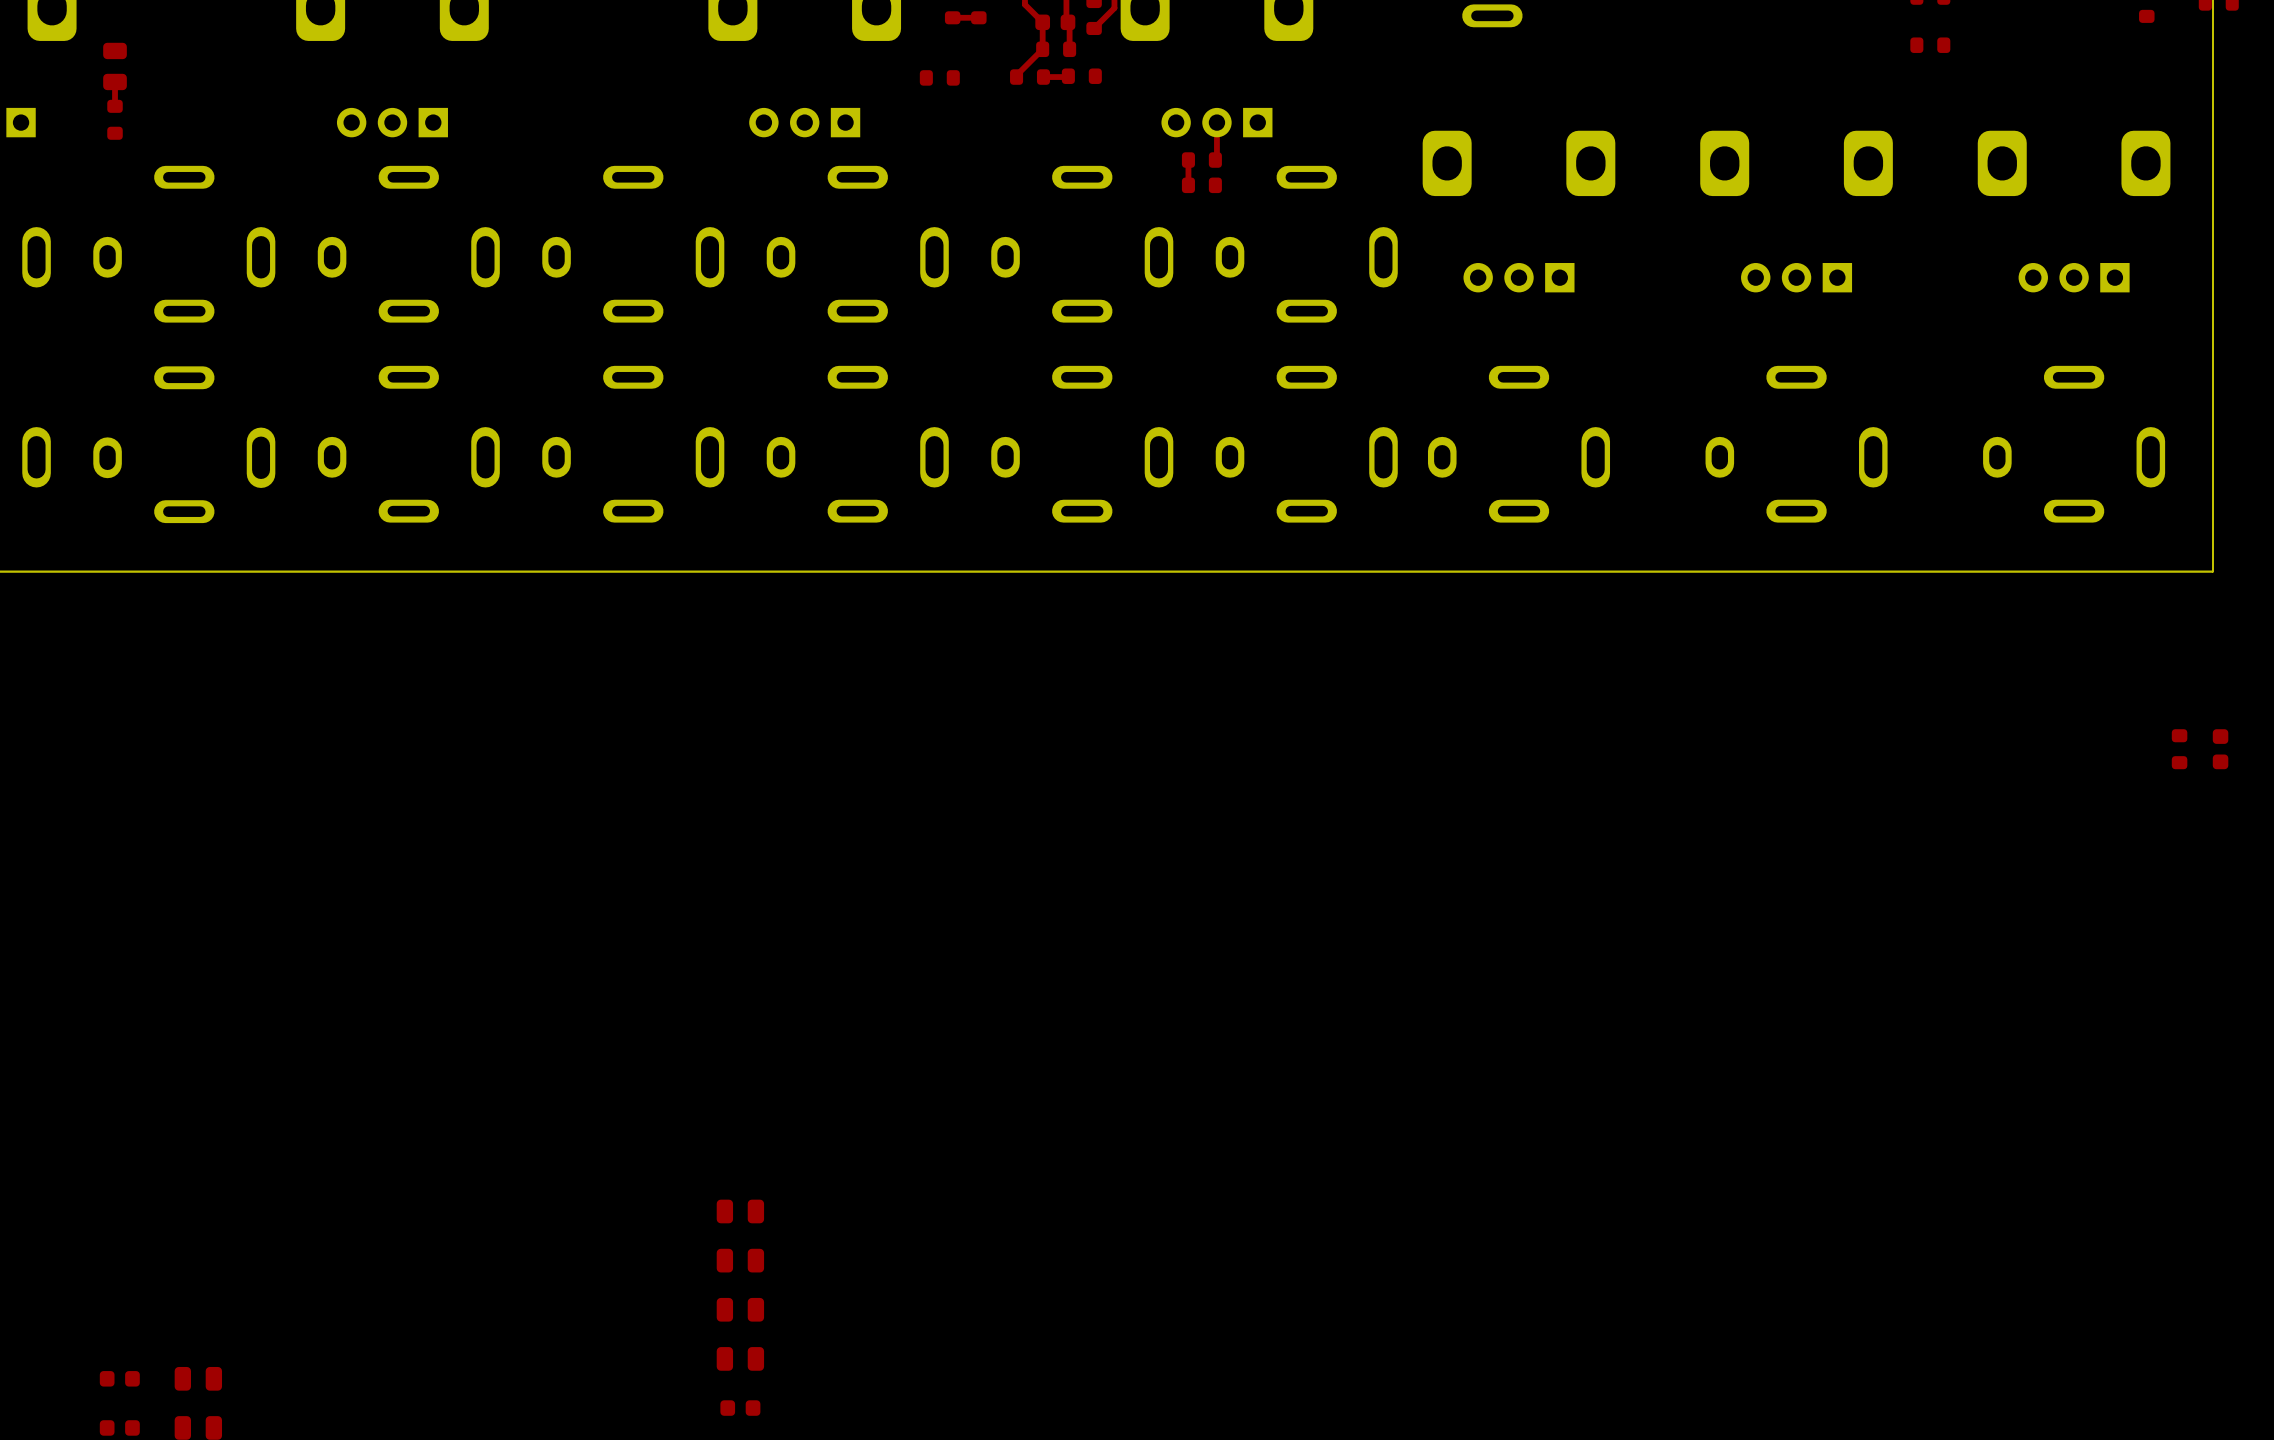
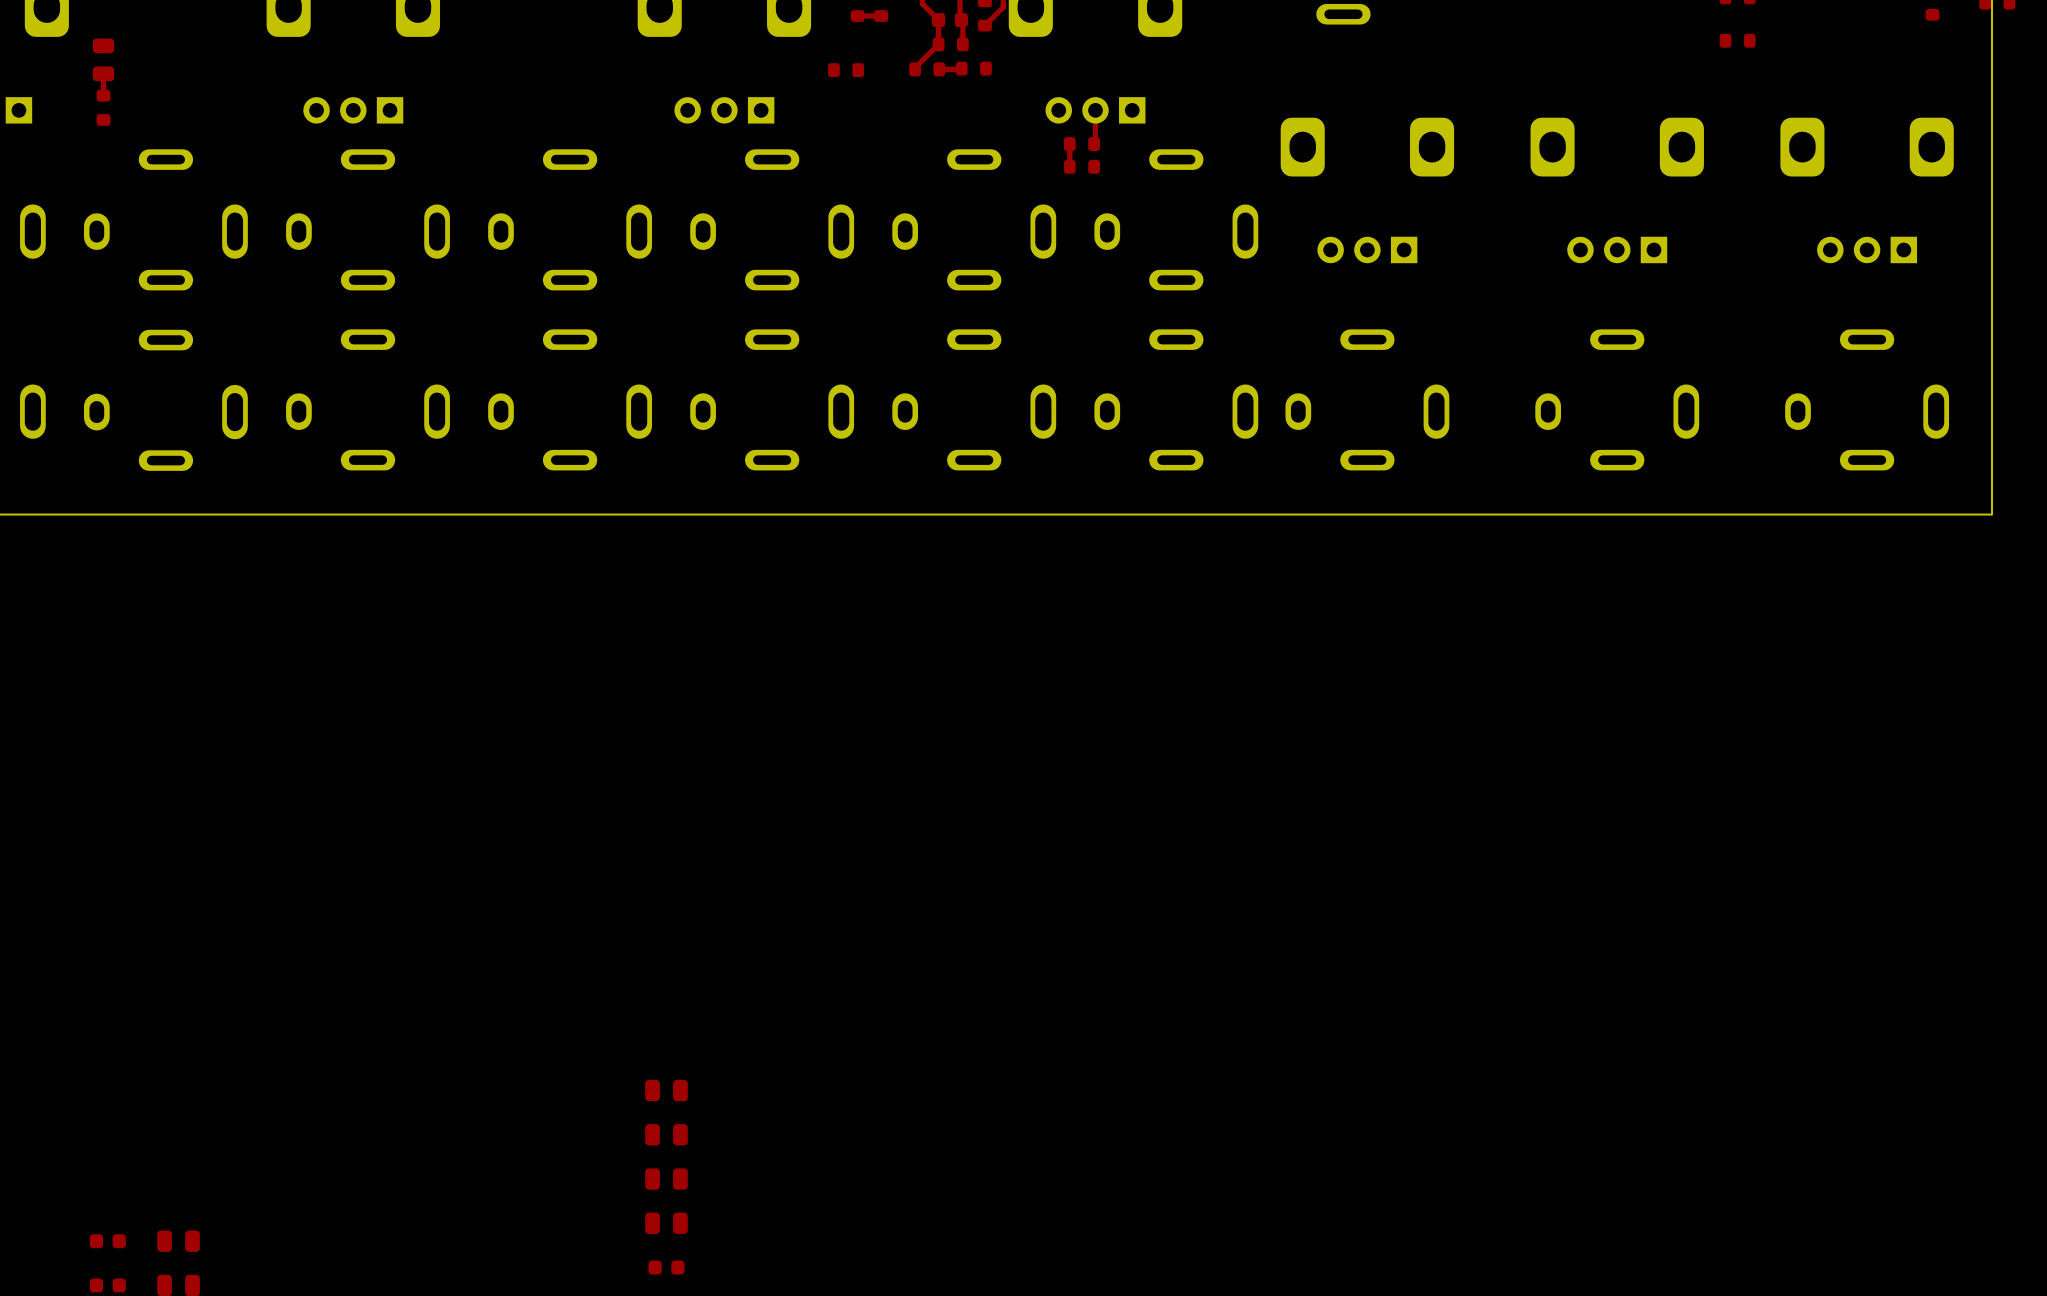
part: (2179, 749) -> none
part: (2220, 749) -> none

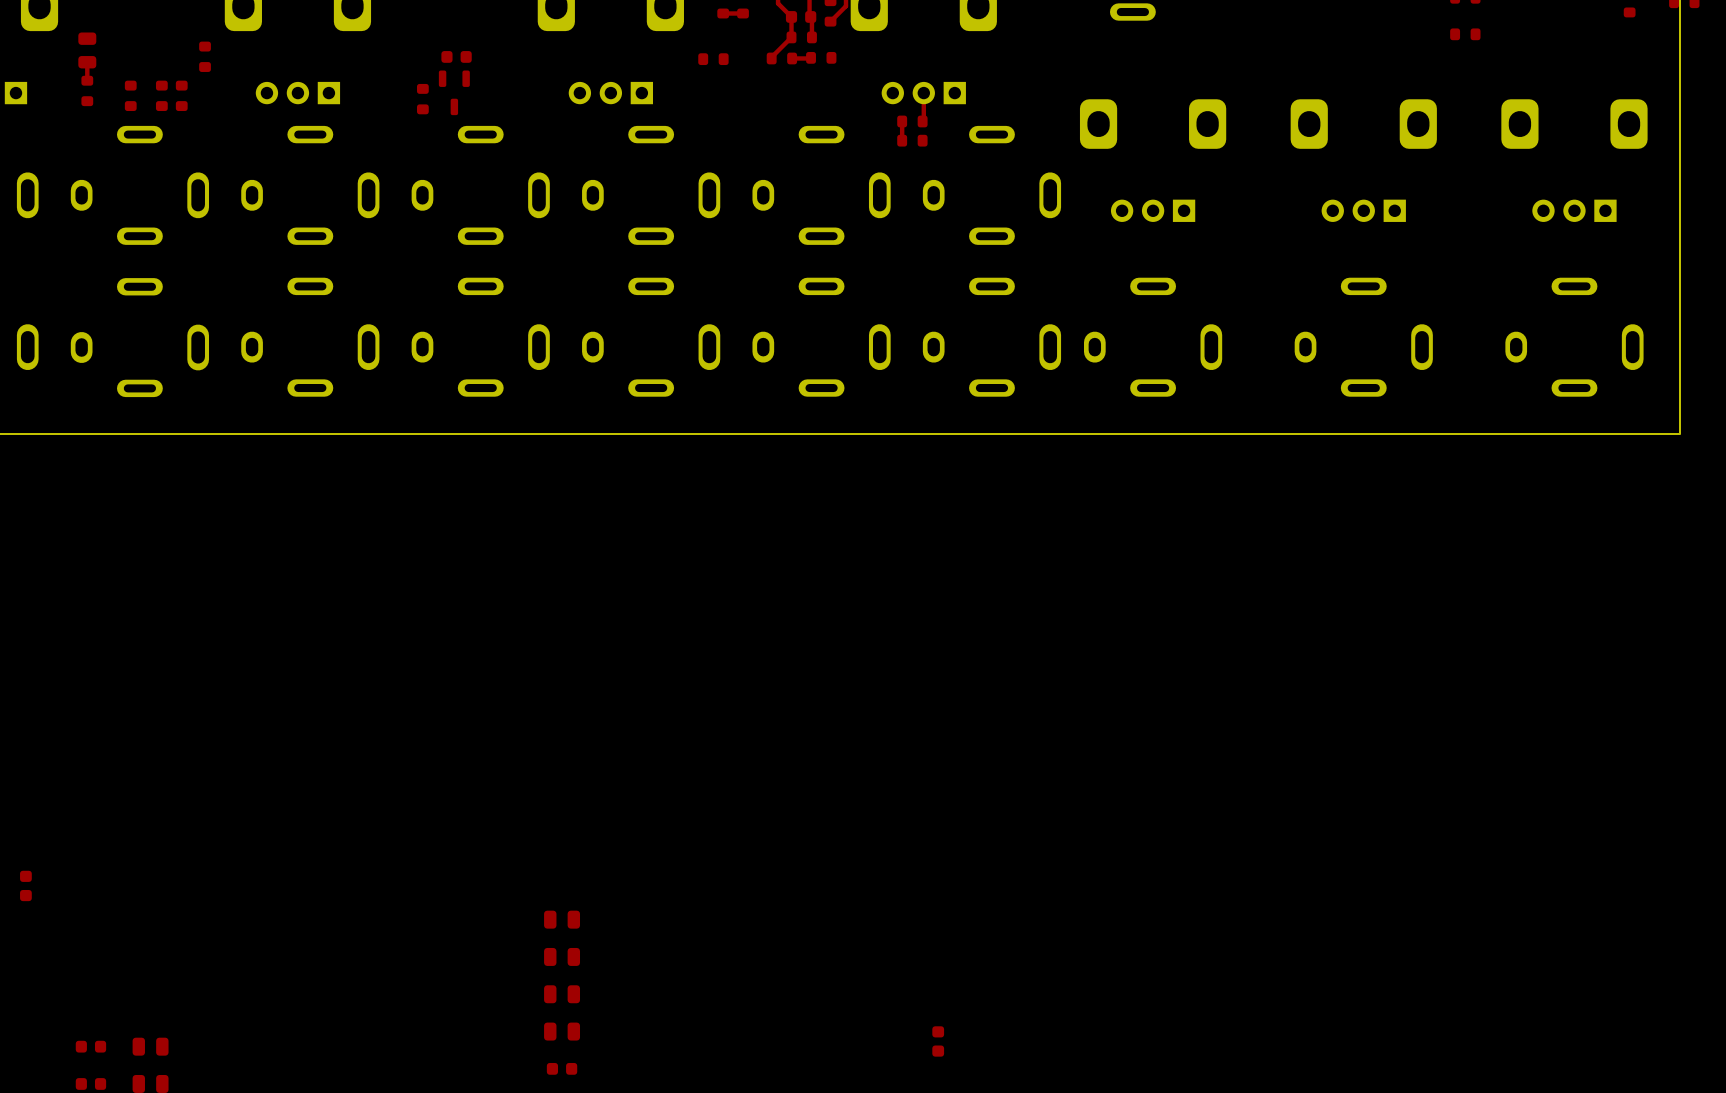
part: none -> (205, 56)
part: none -> (456, 56)
part: none -> (454, 92)
part: none -> (130, 95)
part: none -> (161, 95)
part: none -> (181, 95)
part: none -> (422, 99)
part: none -> (25, 885)
part: none -> (938, 1041)

